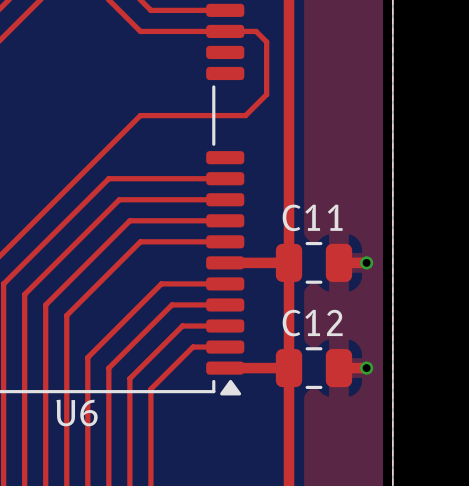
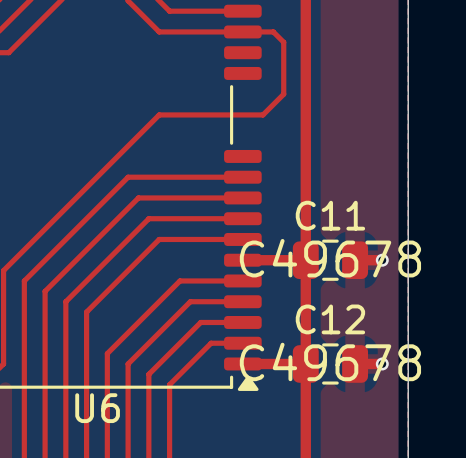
C11 text: none -> C49678 (330, 258)
C12 text: none -> C49678 (330, 361)

